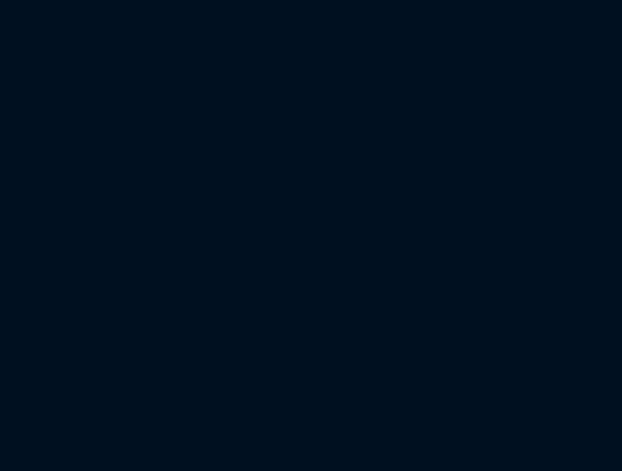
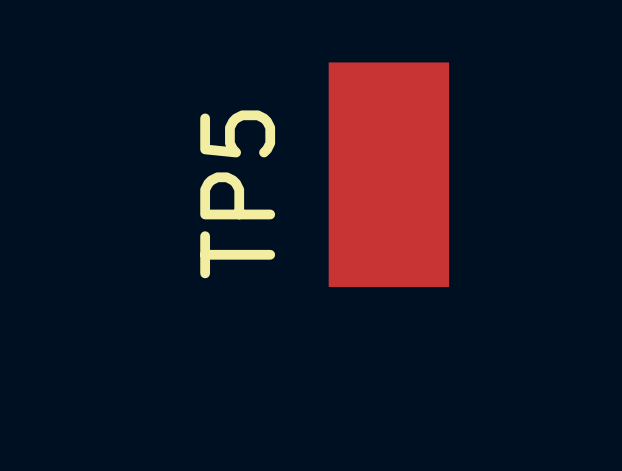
TP5: none -> (388, 174)

